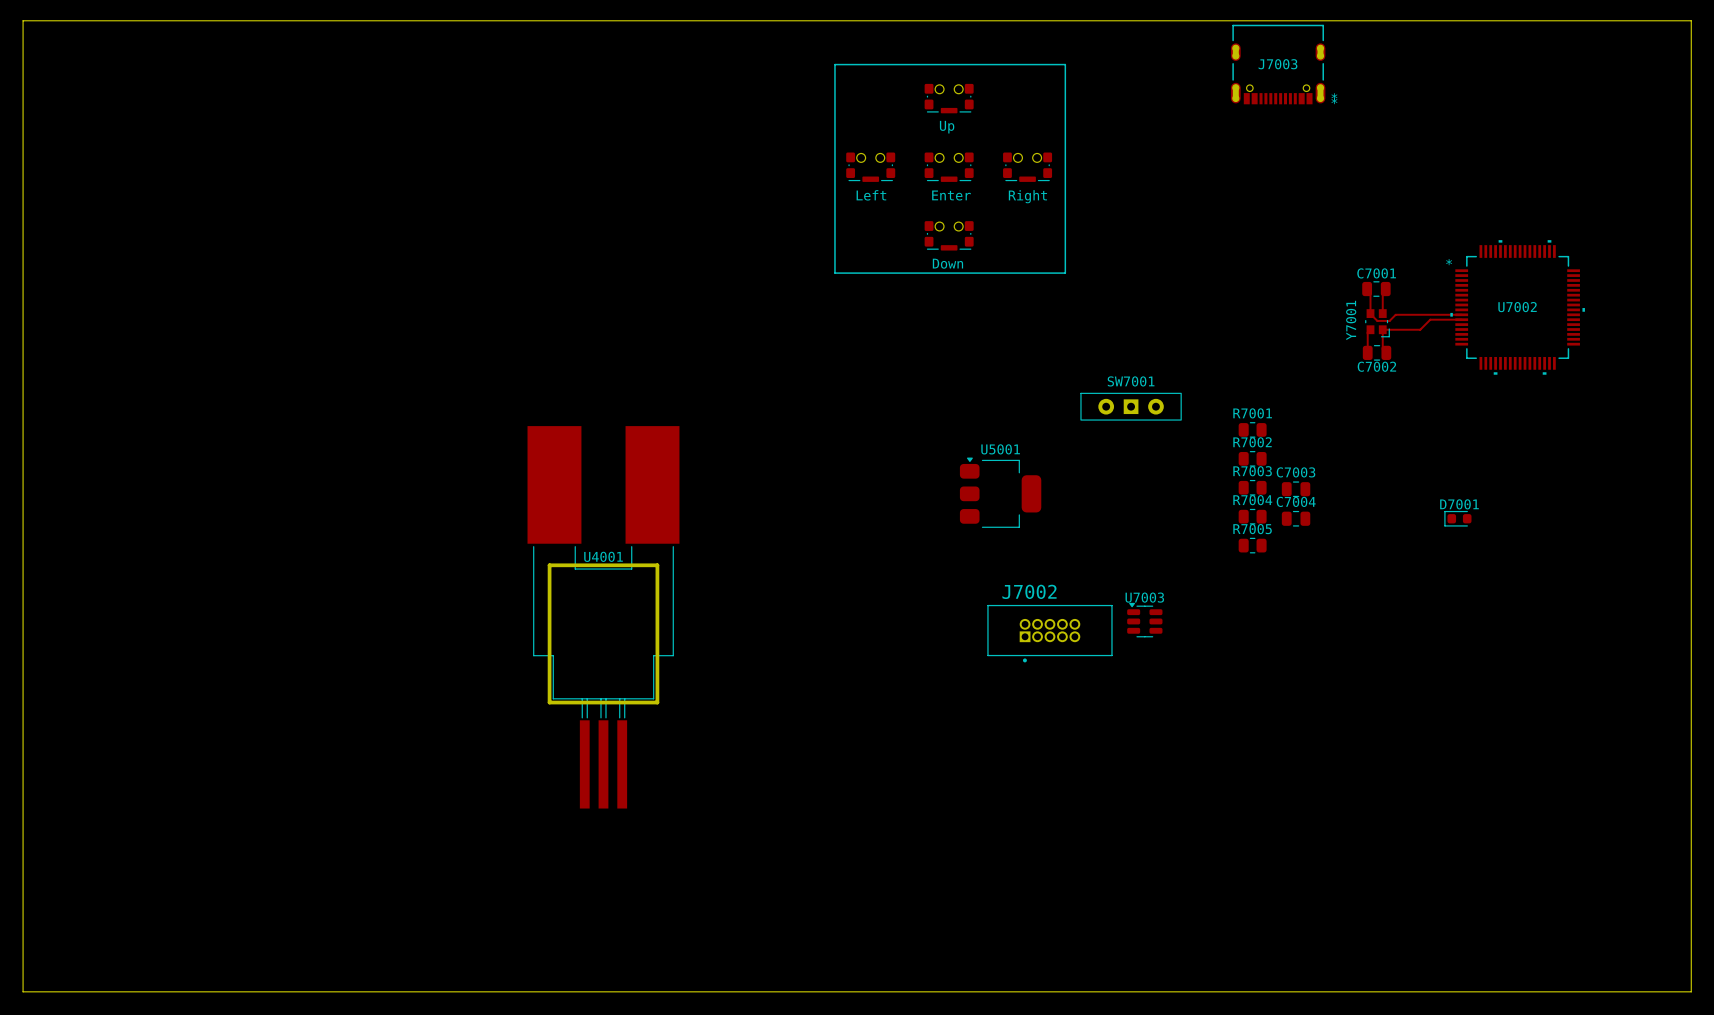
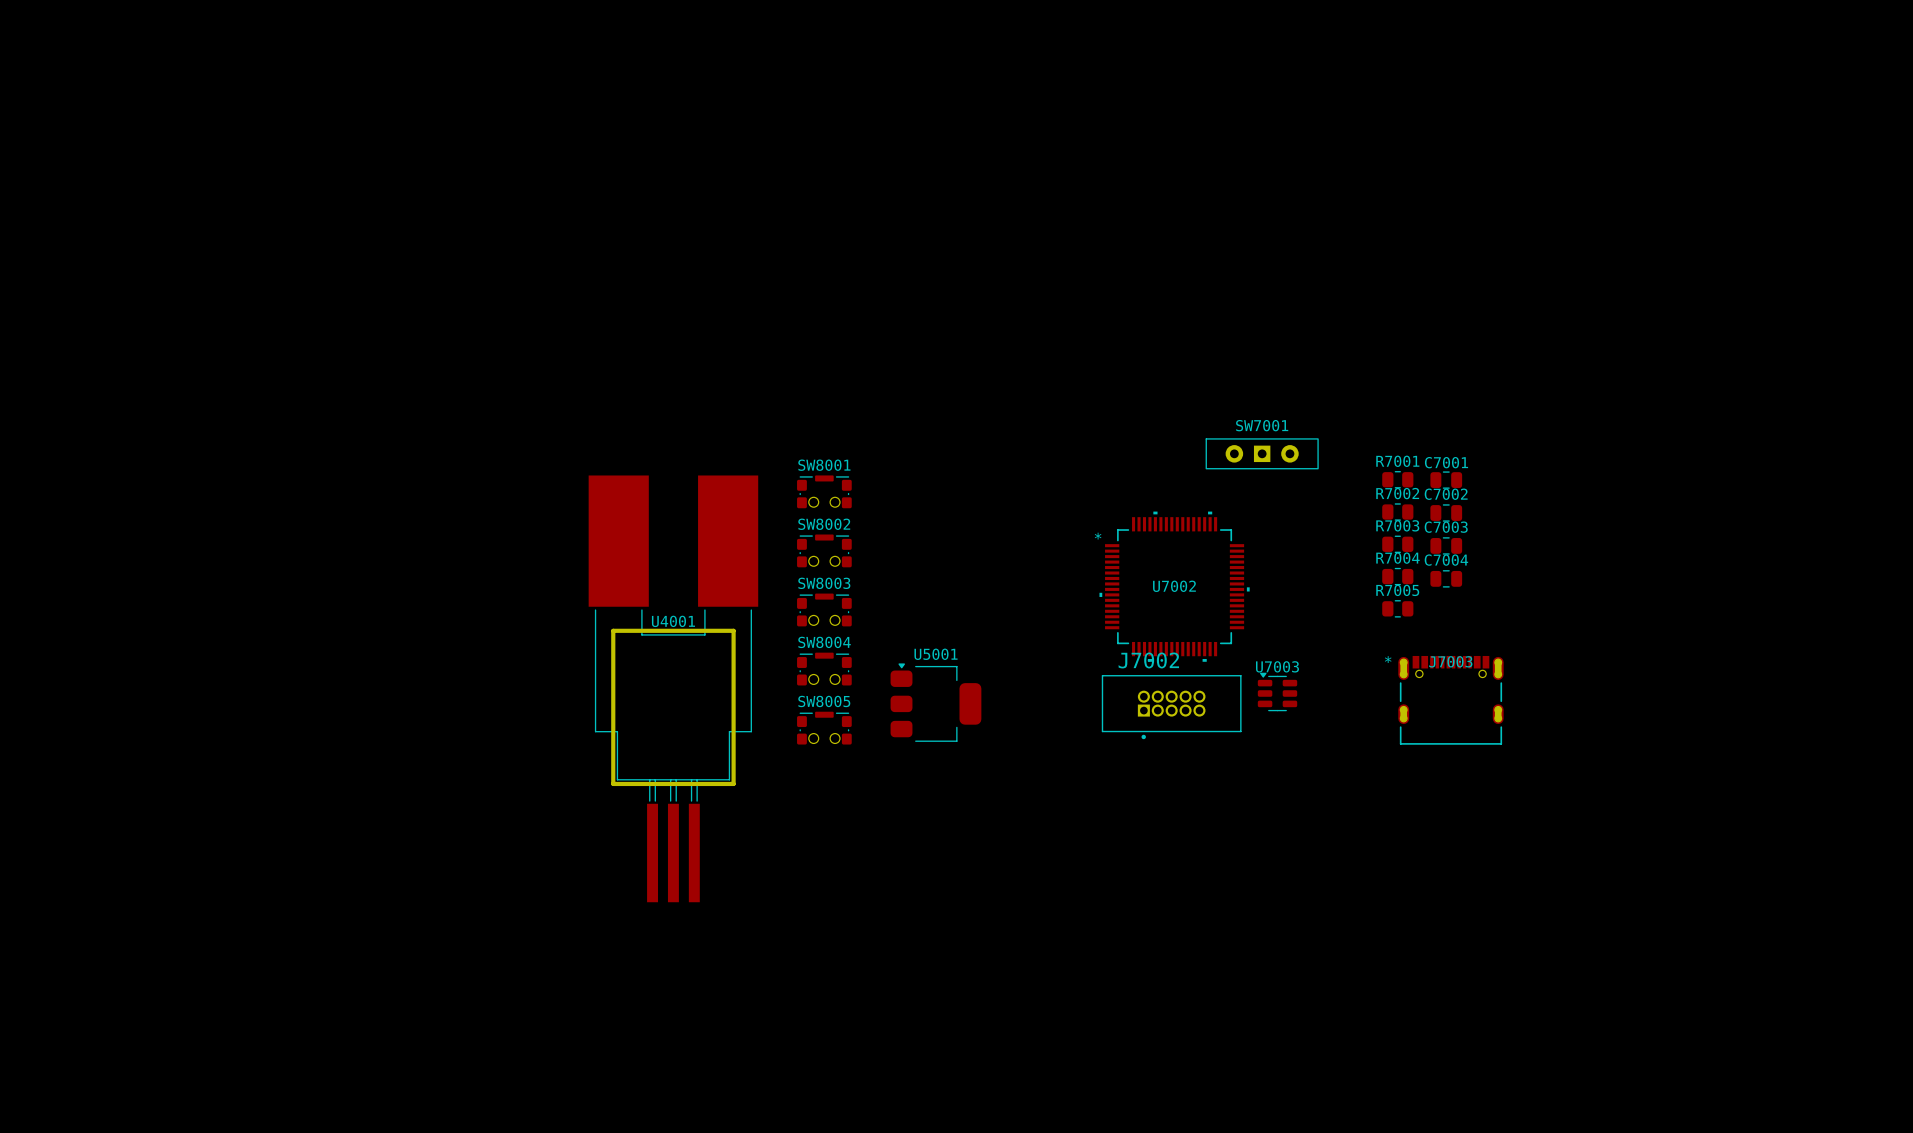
board edge: (23, 20) (1691, 20) (1691, 991) (23, 991) (23, 20) -> none
line: (834, 64) (1065, 64) (1065, 273) (834, 273) (834, 64) -> none
J7003 rotation: 0° (1278, 64) -> 180° (1450, 700)
J7003 position: (1278, 64) -> (1450, 700)
J7003 name position: J7003 (1278, 64) -> J7003 (1450, 661)
part: (949, 98) -> none
text: Up (947, 127) -> none
part: (870, 167) -> none
part: (949, 167) -> none
part: (1027, 167) -> none
text: Left (871, 195) -> none
text: Enter (951, 195) -> none
text: Right (1027, 196) -> none
part: (949, 235) -> none
text: Down (947, 263) -> none
top track: (1367, 289) (1370, 292) (1370, 314) (1377, 320) (1389, 320) (1395, 314) (1461, 314) -> none
C7001 position: (1376, 289) -> (1446, 480)
top track: (1385, 289) (1382, 292) (1382, 313) -> none
U7002 position: (1517, 307) -> (1174, 586)
top track: (1461, 319) (1430, 319) (1420, 329) (1382, 329) -> none
Y7001: (1377, 323) -> none
top track: (1370, 329) (1367, 332) (1367, 352) -> none
top track: (1382, 329) (1382, 349) (1386, 352) -> none
C7002 position: (1377, 352) -> (1446, 513)
C7002 name position: C7002 (1376, 366) -> C7002 (1446, 494)
SW8001: none -> (824, 491)
U5001 position: (1000, 492) -> (935, 702)
SW8002: none -> (824, 550)
D7001: (1457, 518) -> none
SW8003: none -> (824, 609)
SW8004: none -> (824, 669)
SW8005: none -> (824, 728)

